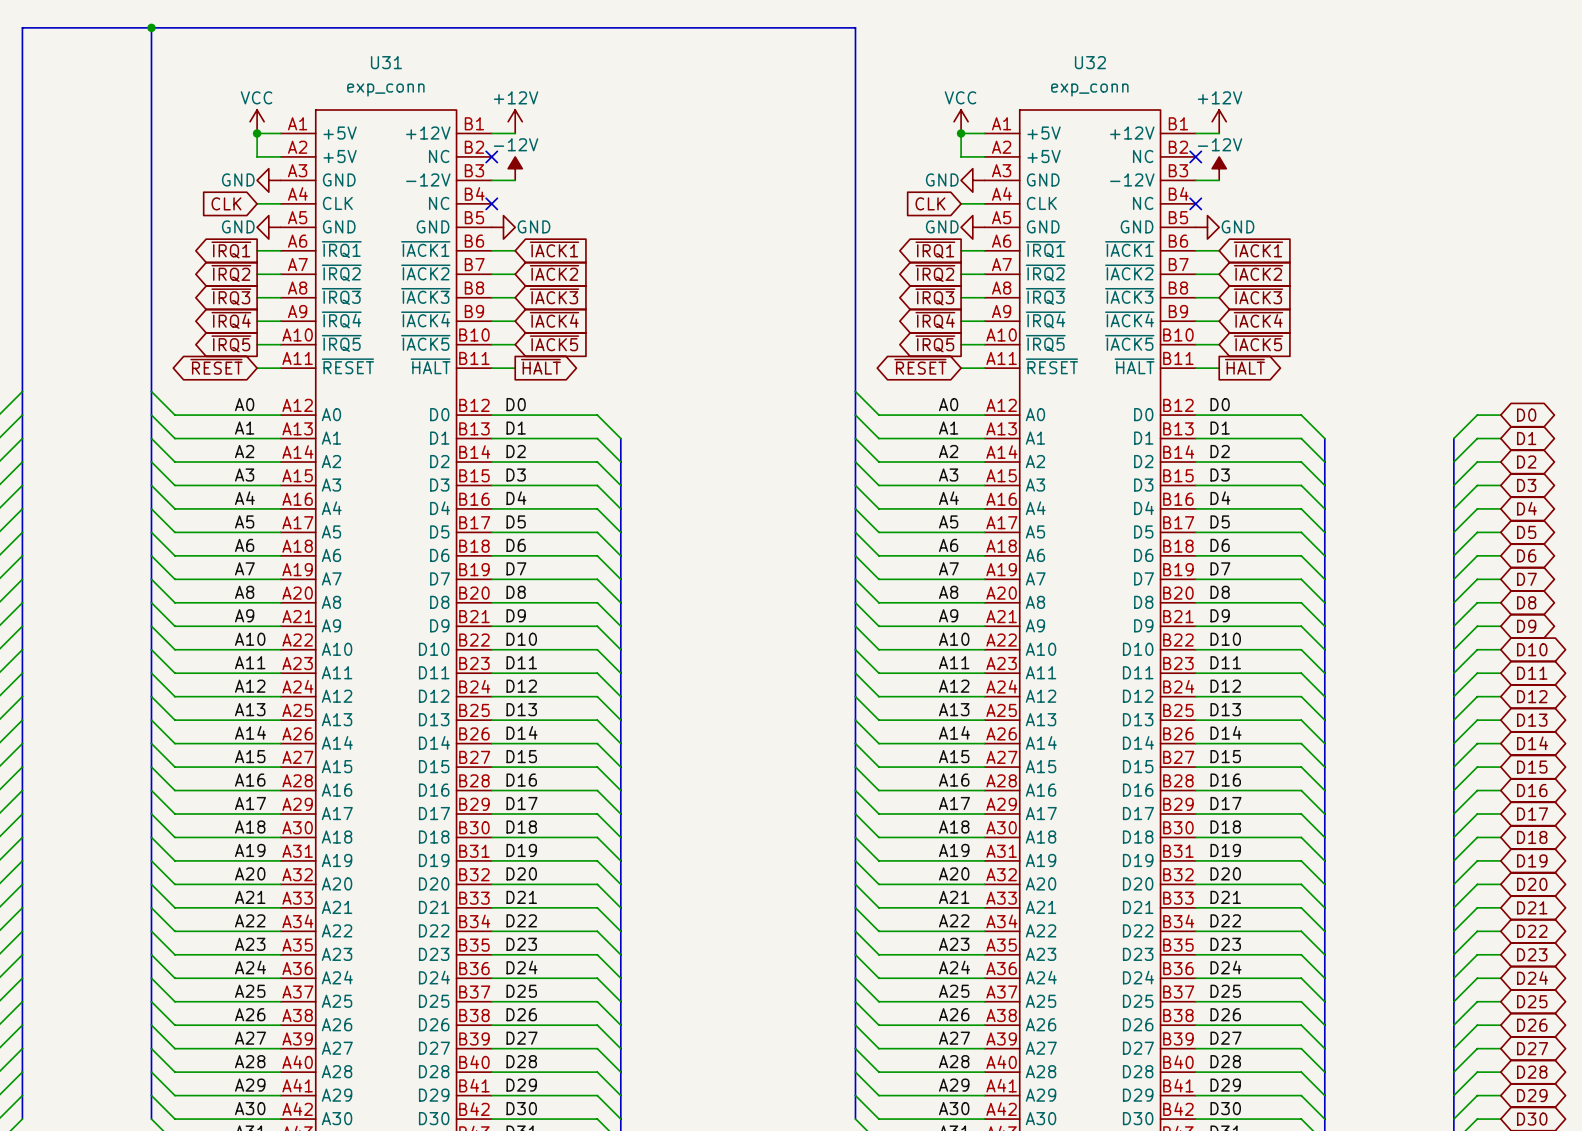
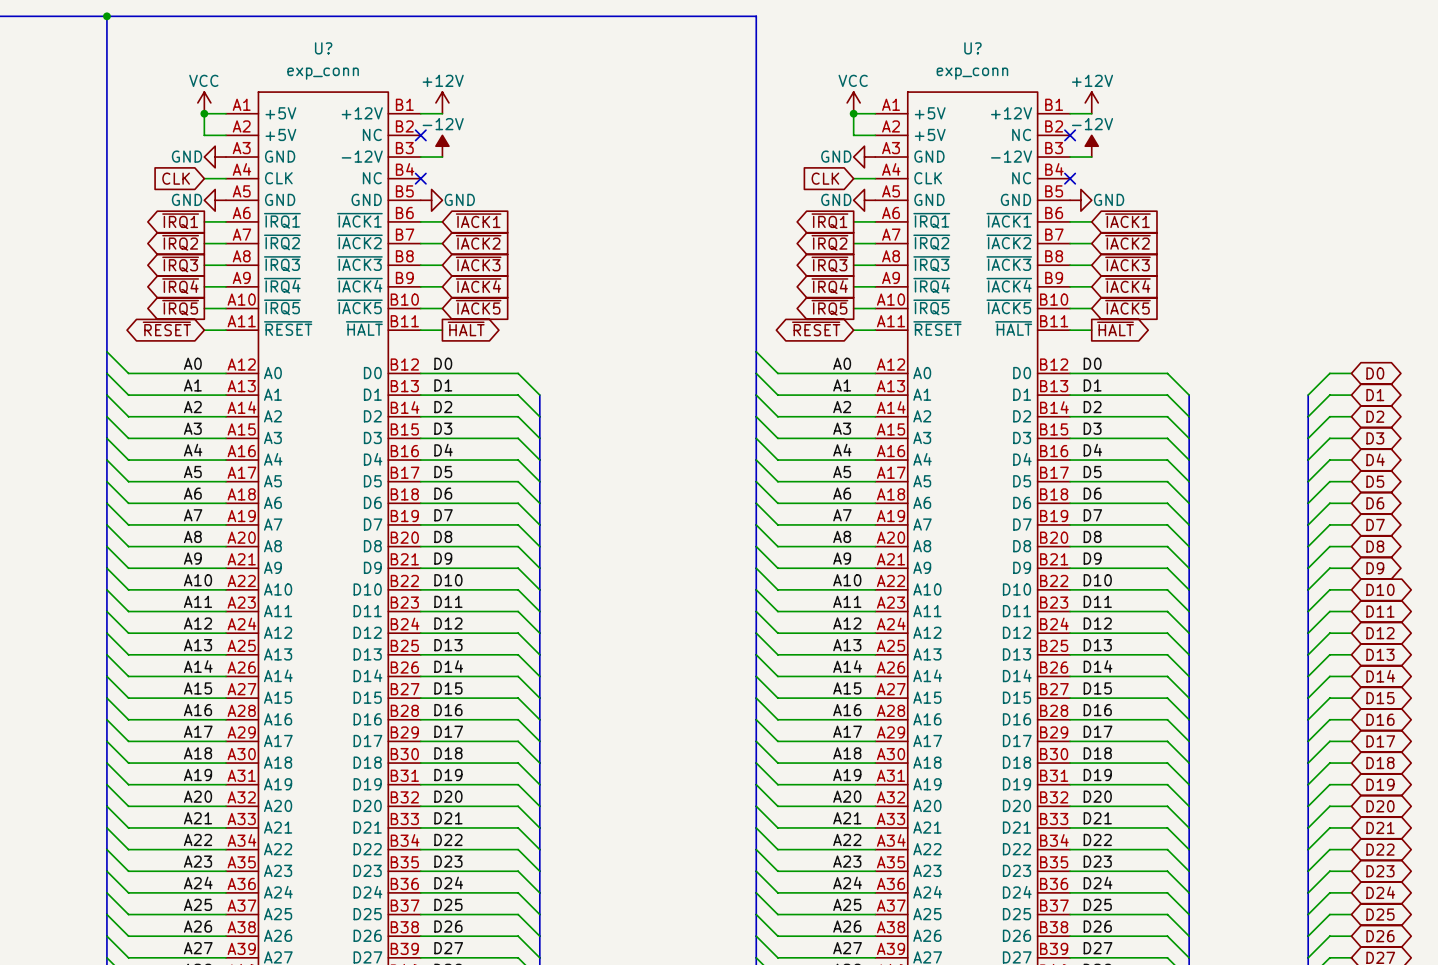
U31 name: U31 (386, 62) -> U? (323, 48)
U32 name: U32 (1090, 62) -> U? (972, 48)

